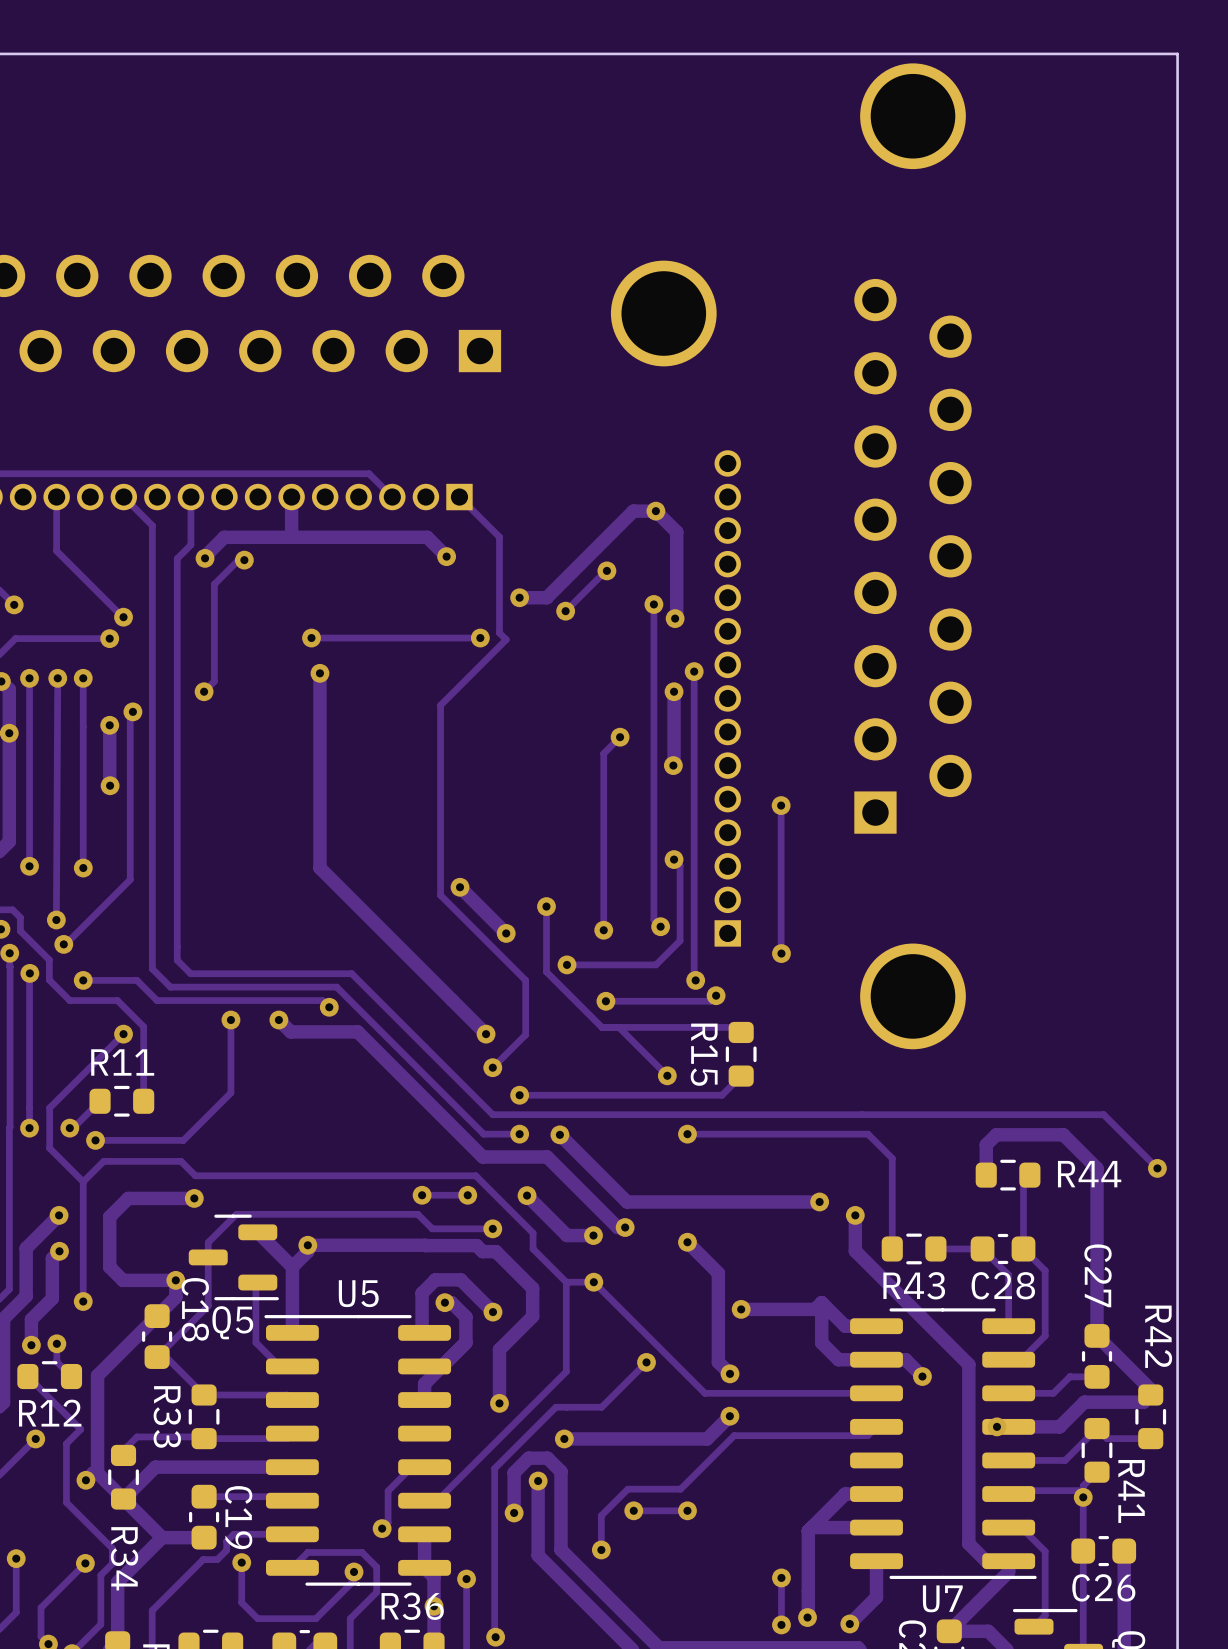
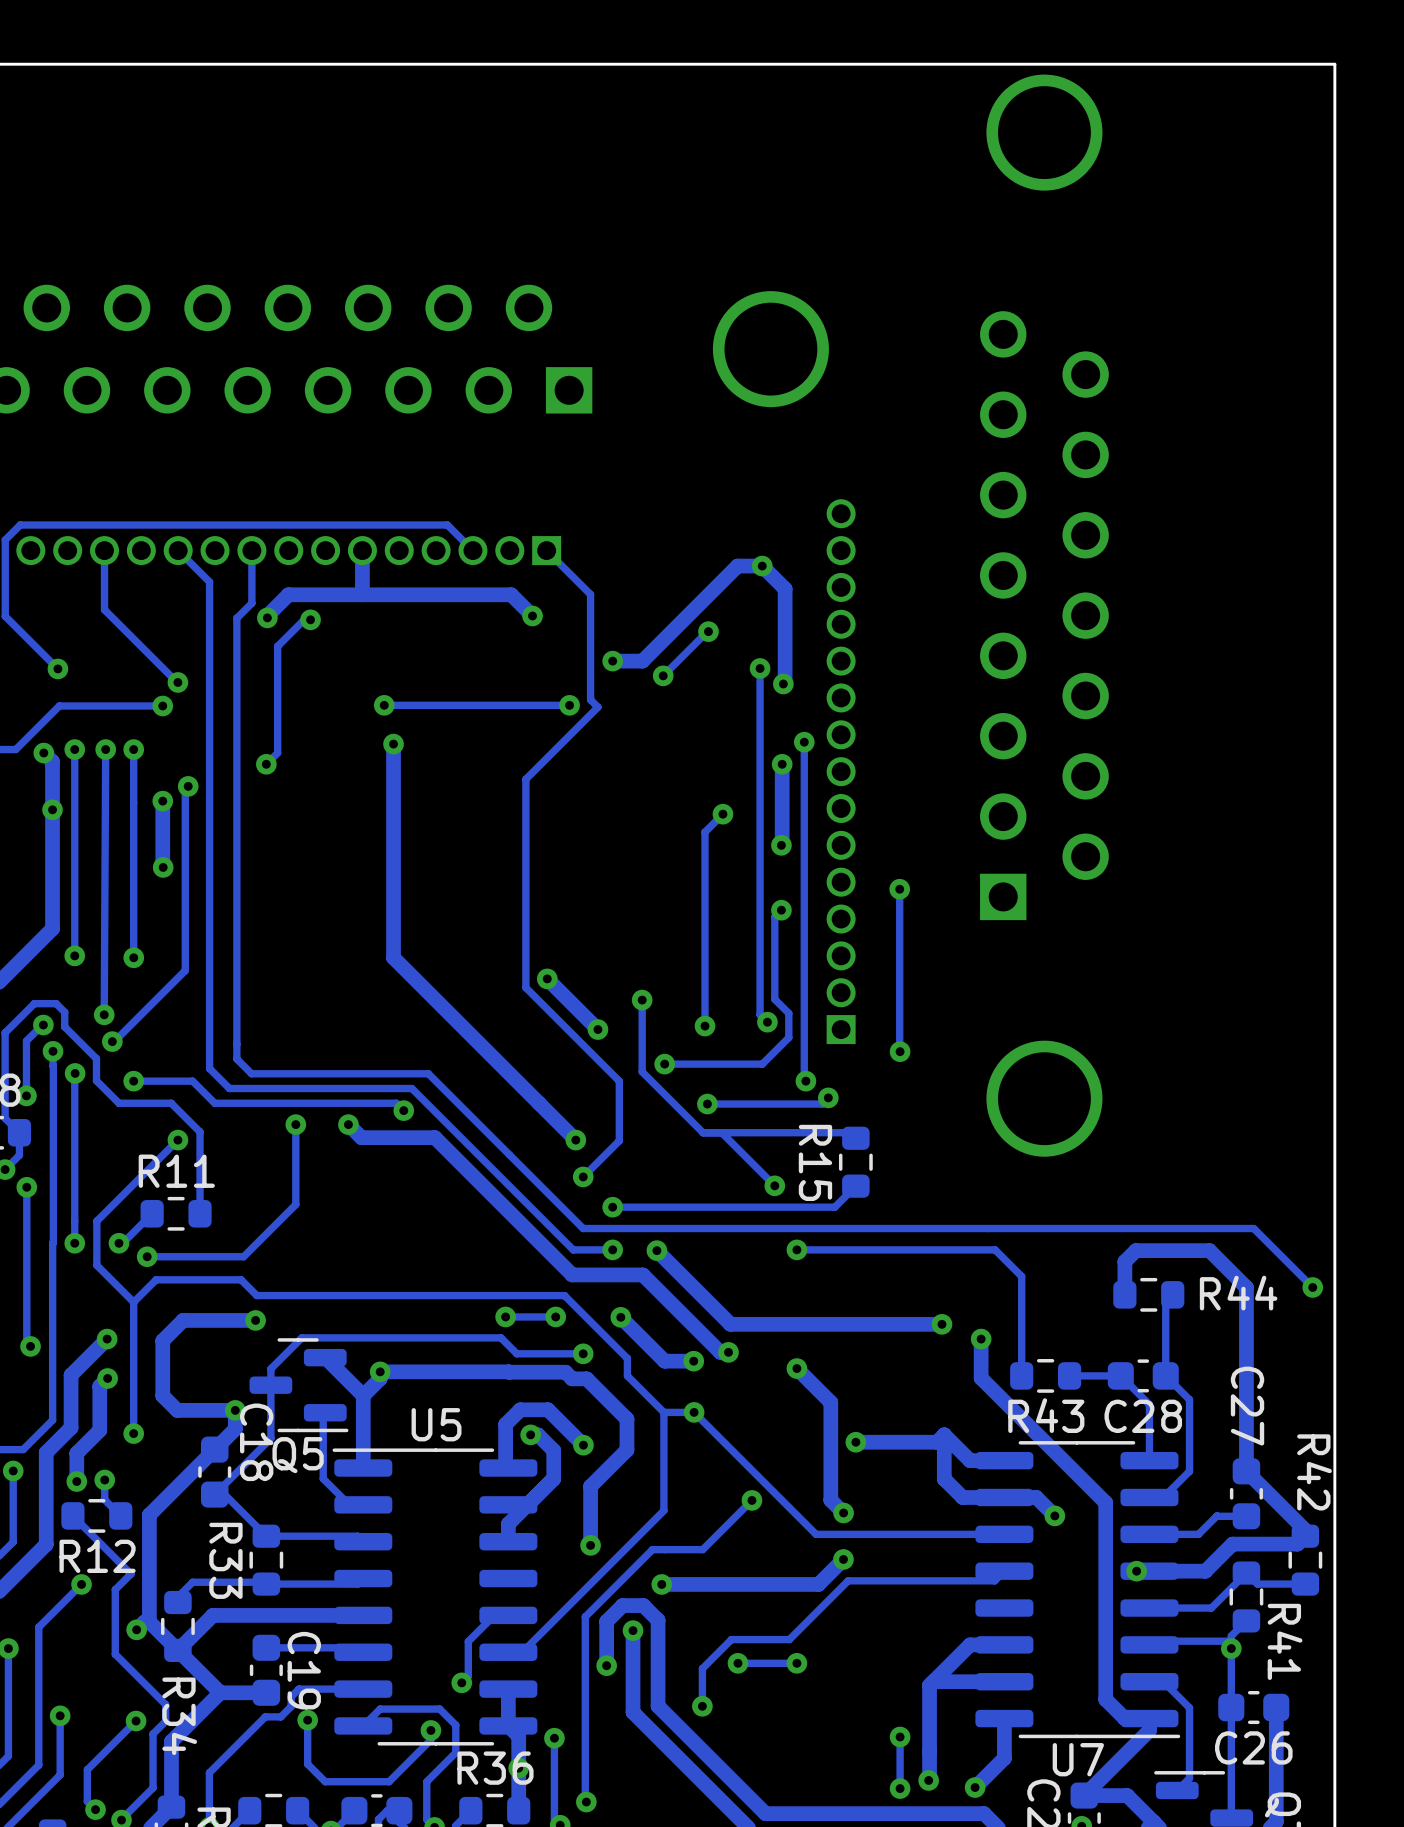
track: (674, 859) (680, 865) (680, 918) -> (781, 910) (774, 916) (774, 999) (788, 1013)
via position: (674, 859) -> (781, 910)

